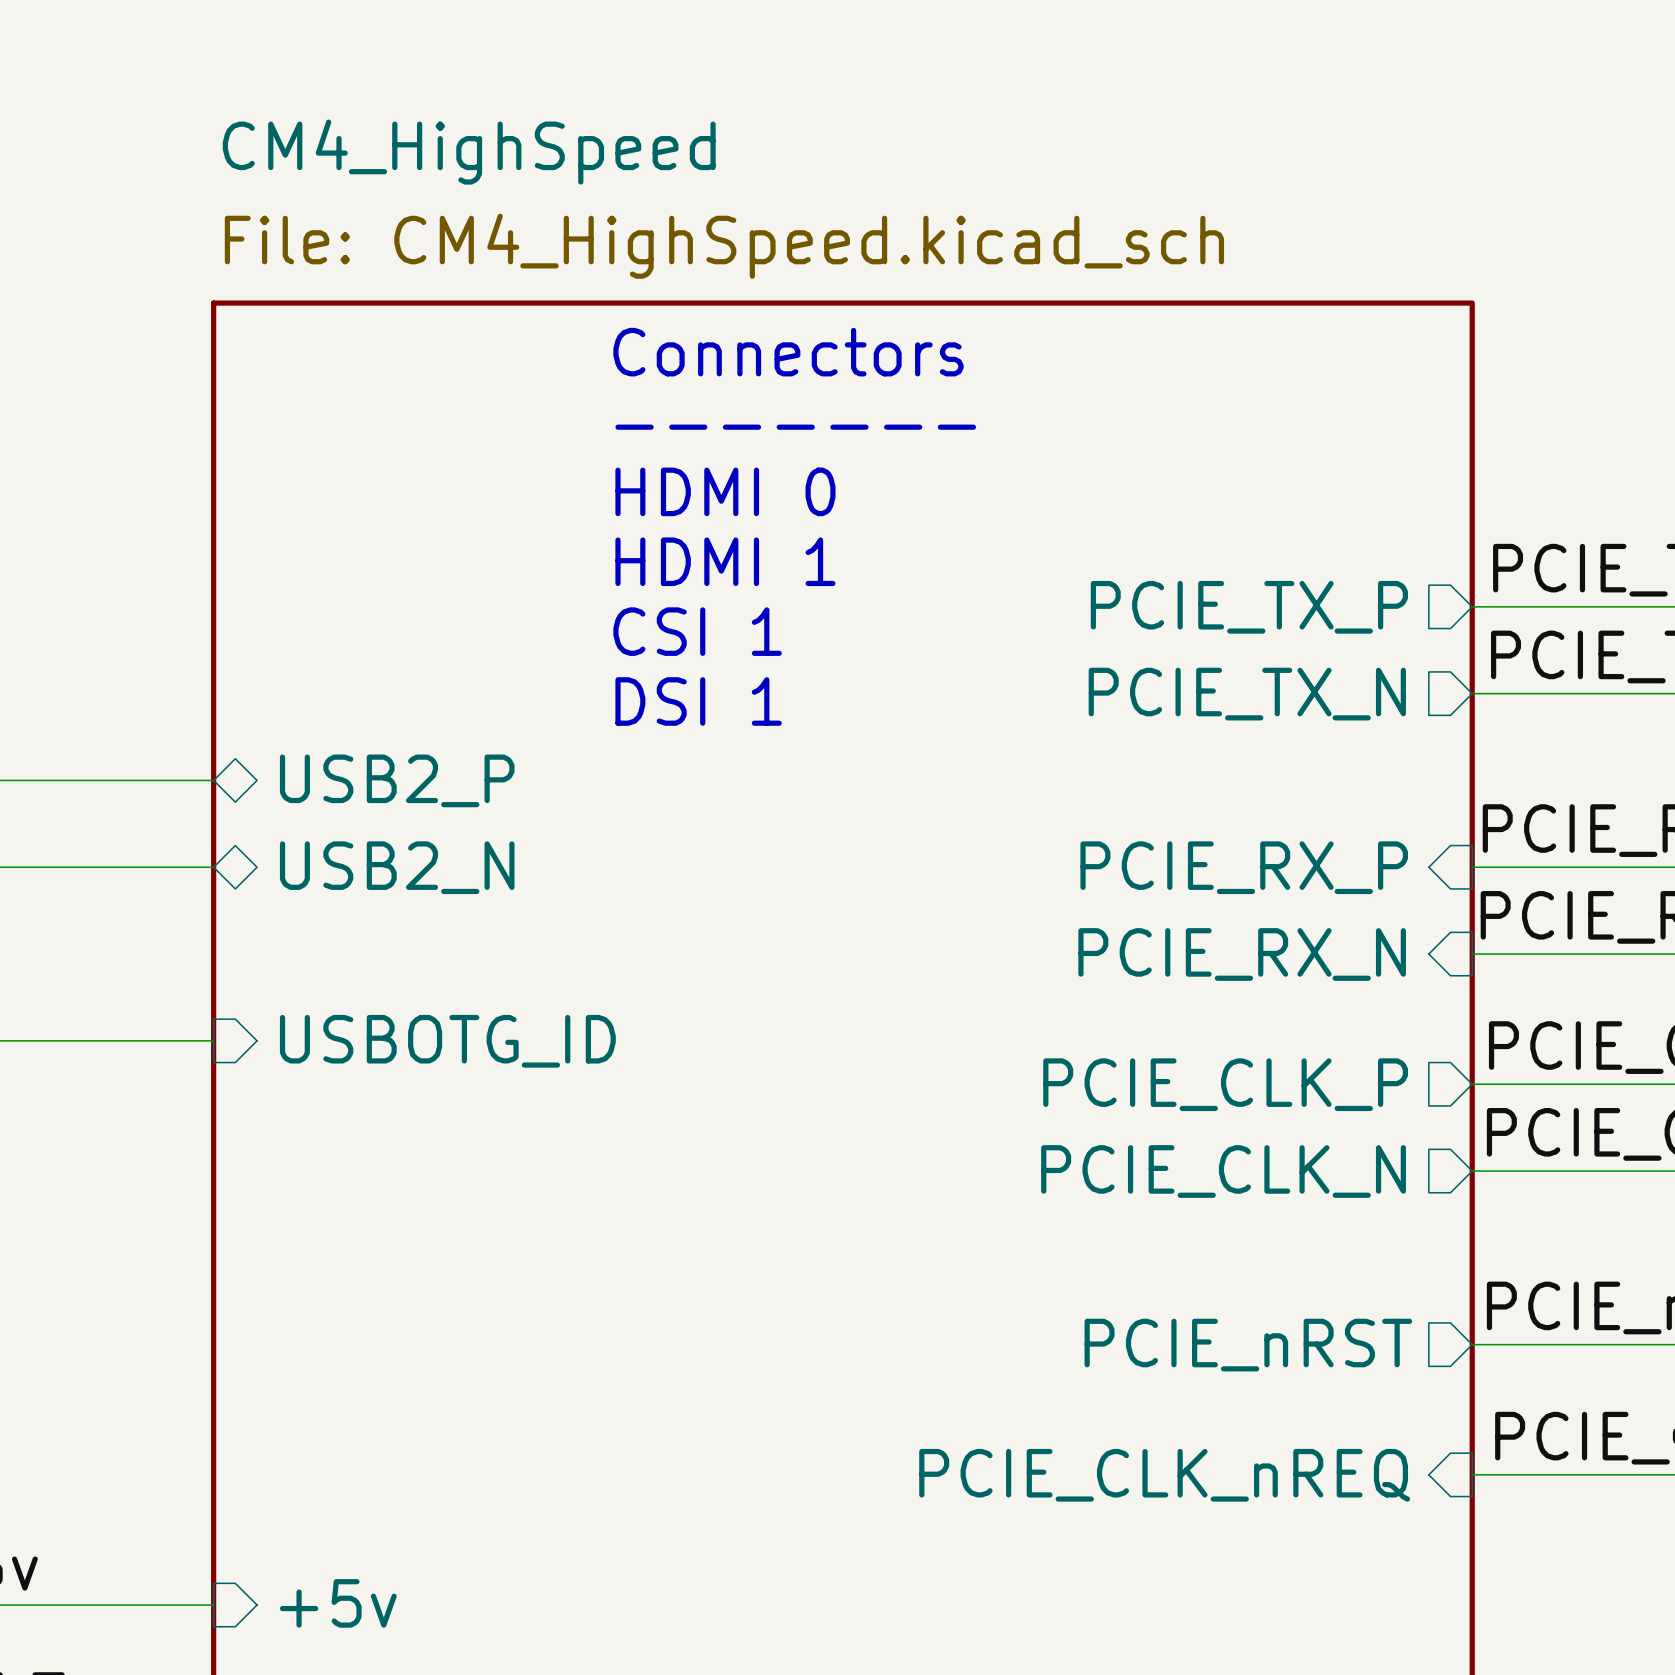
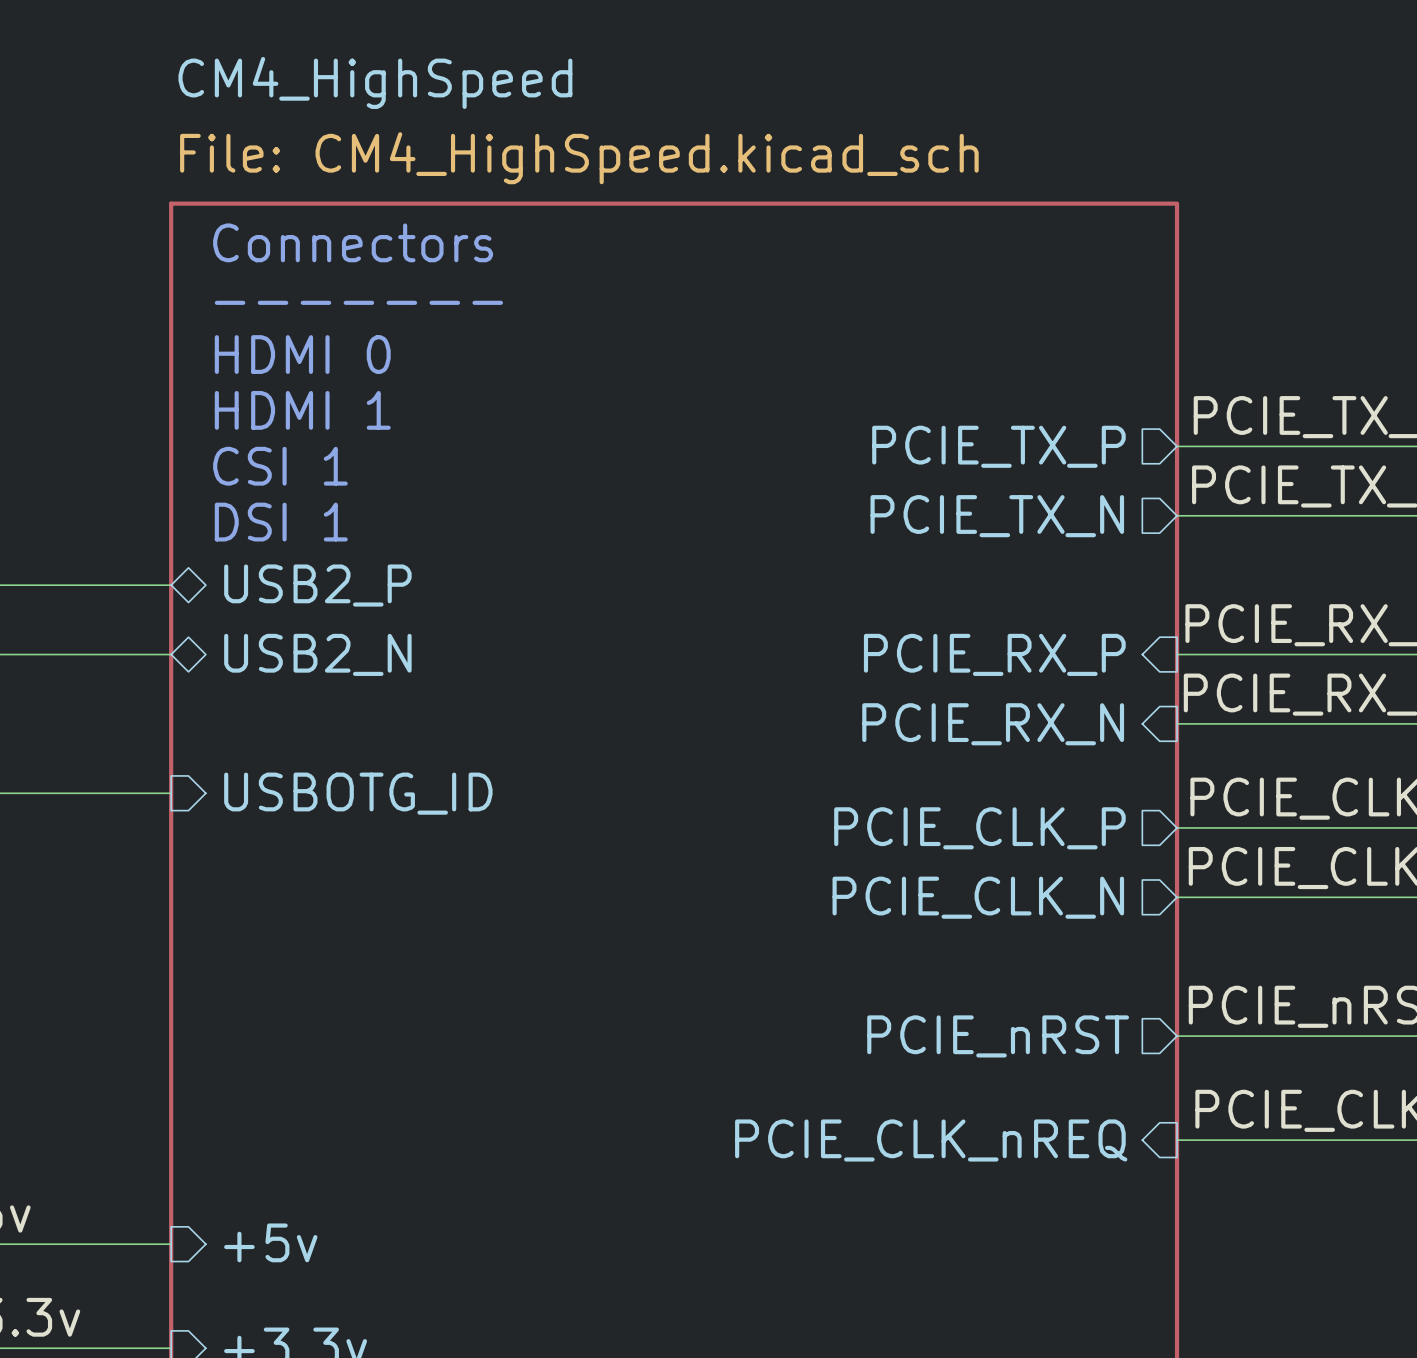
text position: Connectors (788, 352) -> Connectors (353, 242)
text position: ------- (795, 427) -> ------- (358, 302)
text position: HDMI 0 (725, 491) -> HDMI 0 (302, 354)
text position: HDMI 1 (725, 561) -> HDMI 1 (302, 410)
text position: CSI 1 (697, 631) -> CSI 1 (280, 466)
text position: DSI 1 (698, 701) -> DSI 1 (281, 522)

